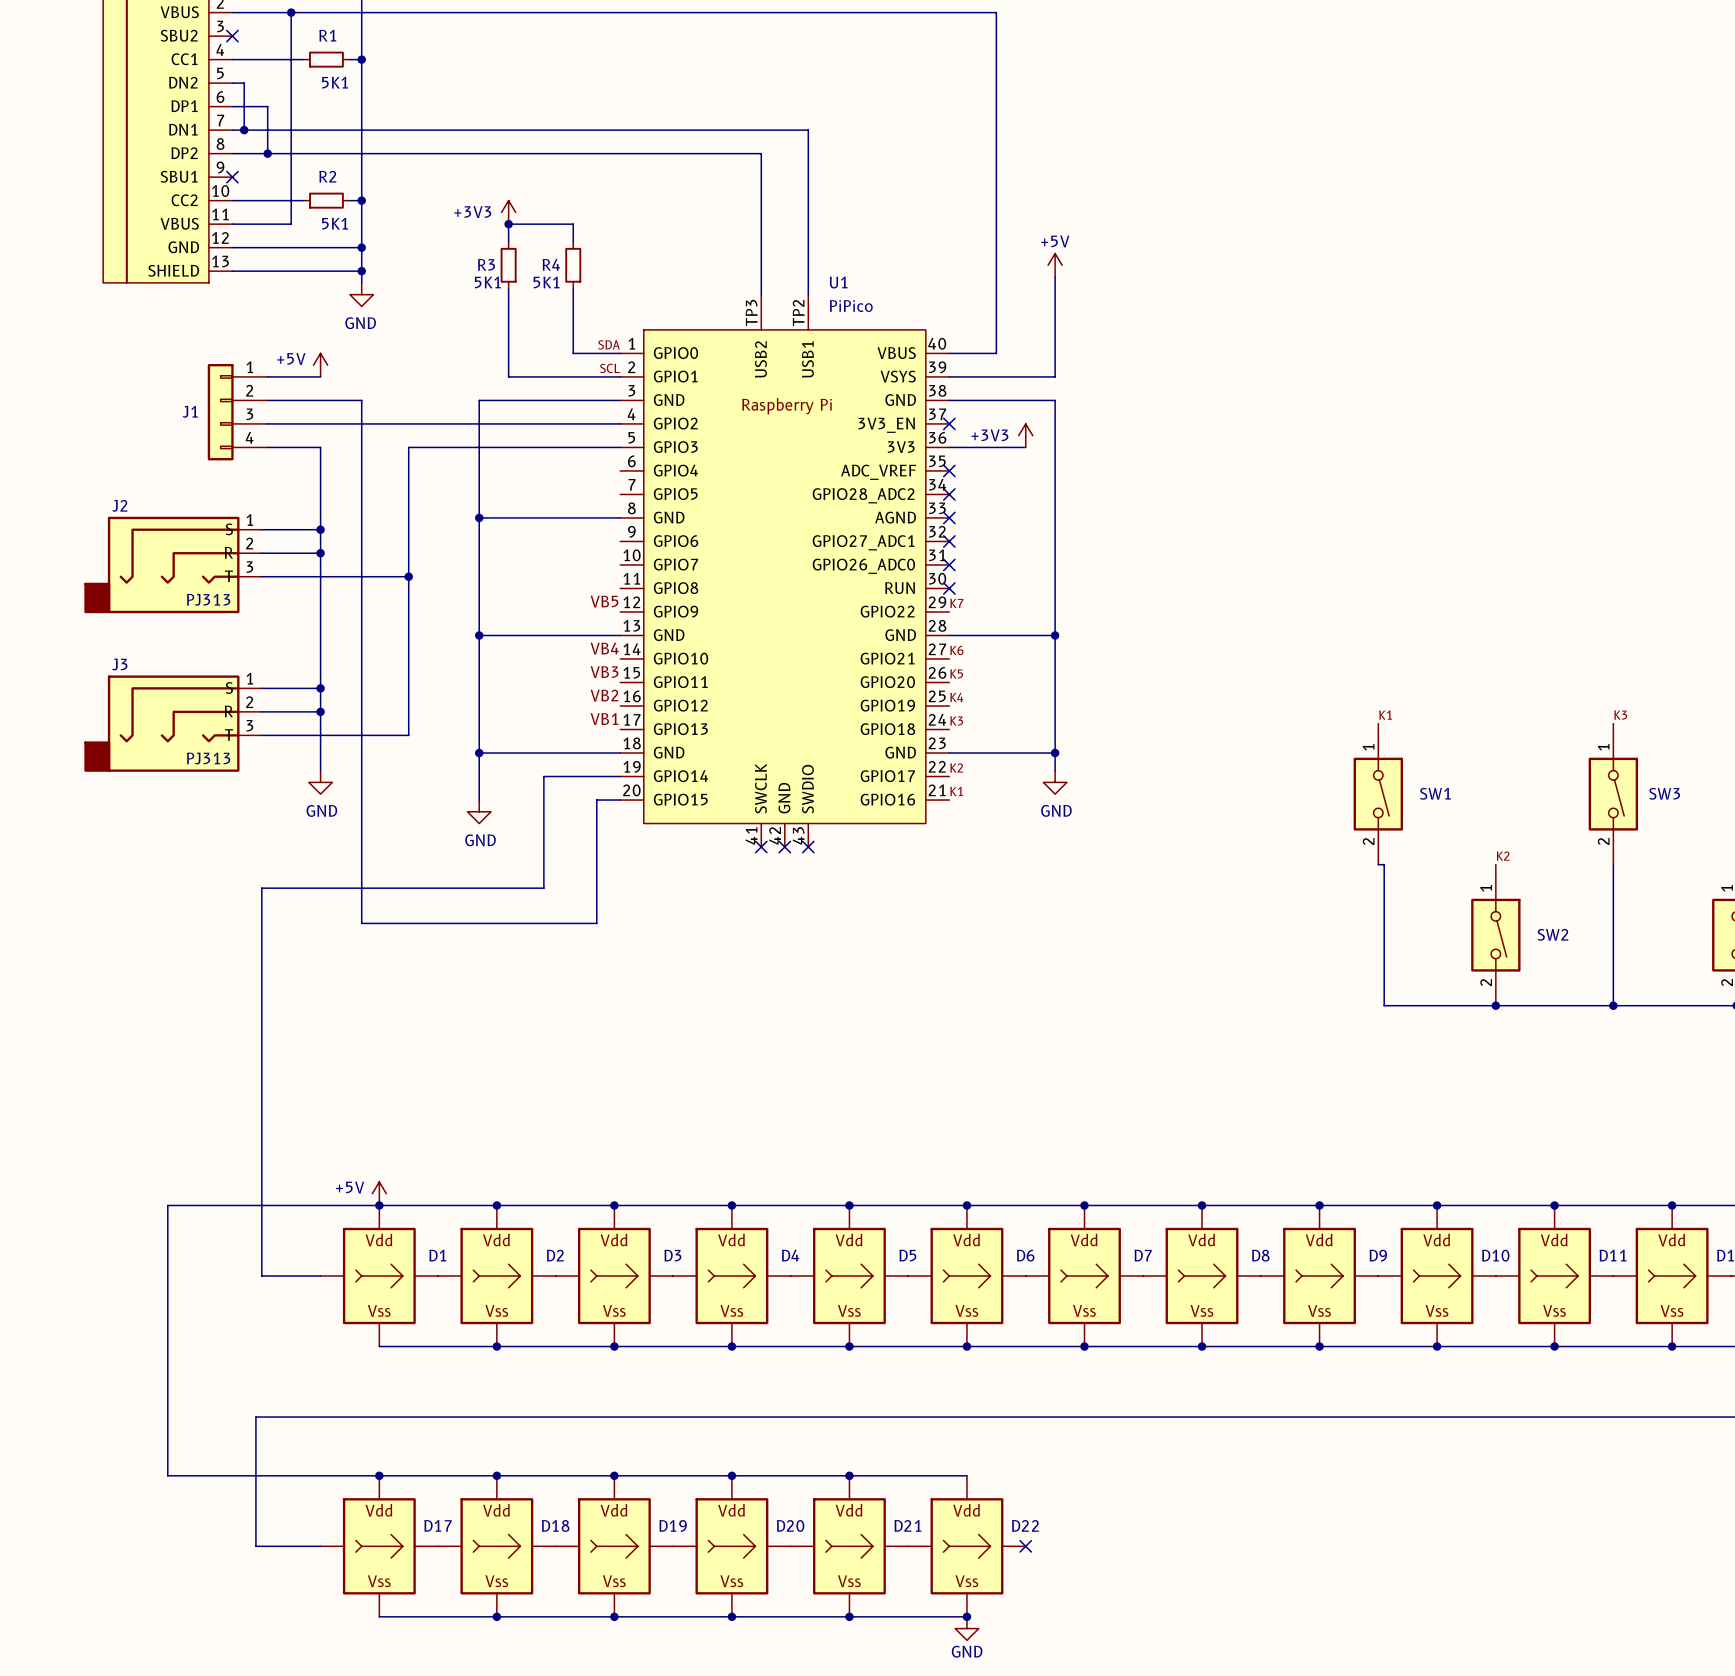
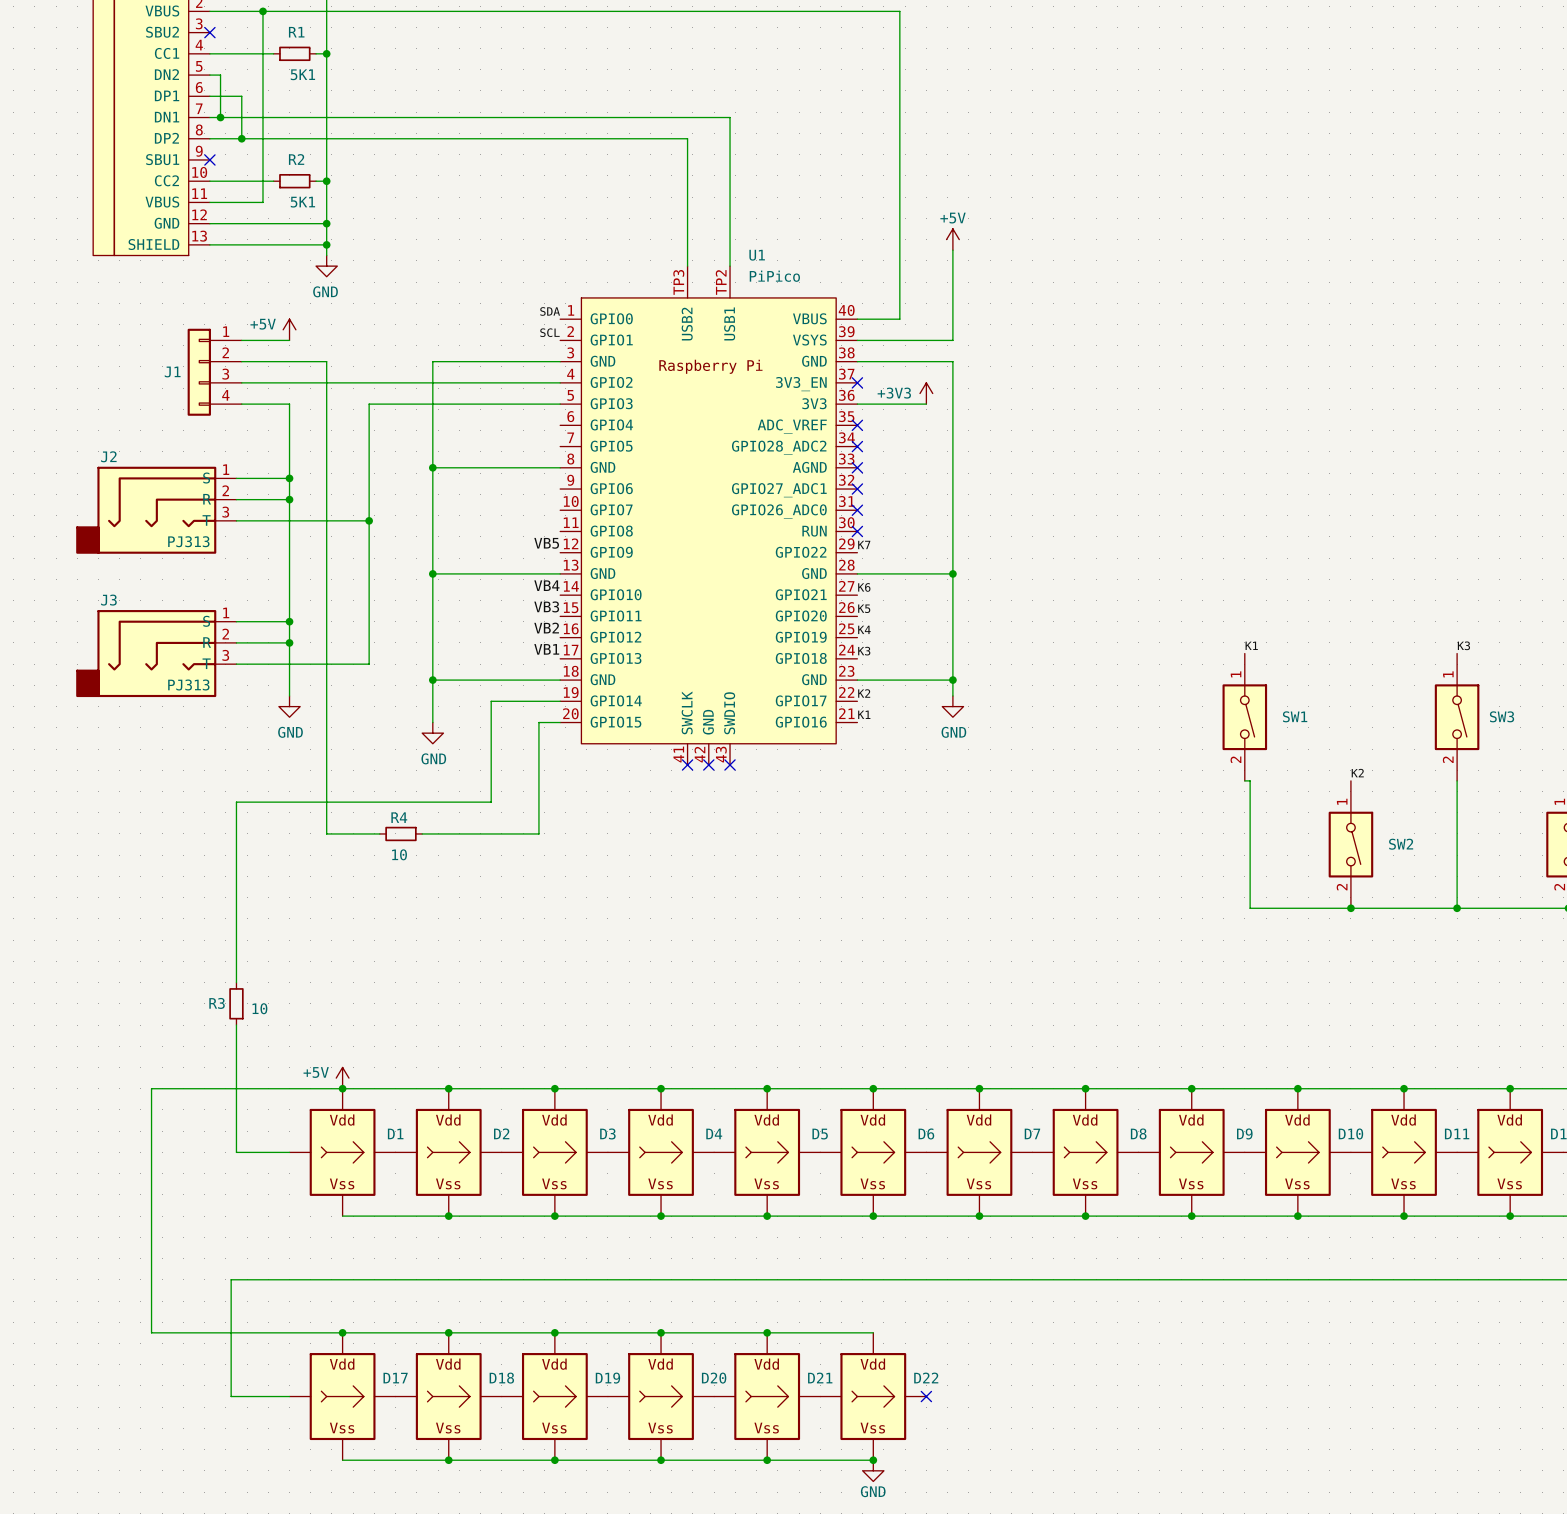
power symbol: +3V3 (508, 212) -> none
junction: (508, 224) -> none
wire: (508, 241) (508, 224) (573, 224) (573, 241) -> none
R3 position: (508, 265) -> (236, 1003)
R4 rotation: 0° (573, 265) -> 90° clockwise (400, 833)
R4 position: (573, 265) -> (400, 833)
R3 value: 5K1 (487, 282) -> 10 (259, 1008)
R4 value: 5K1 (546, 282) -> 10 (399, 854)
wire: (508, 288) (508, 376) (620, 376) -> none
wire: (573, 288) (573, 353) (620, 353) -> none
wire: (420, 923) (467, 923) -> none
wire: (261, 1087) (261, 1134) -> none

